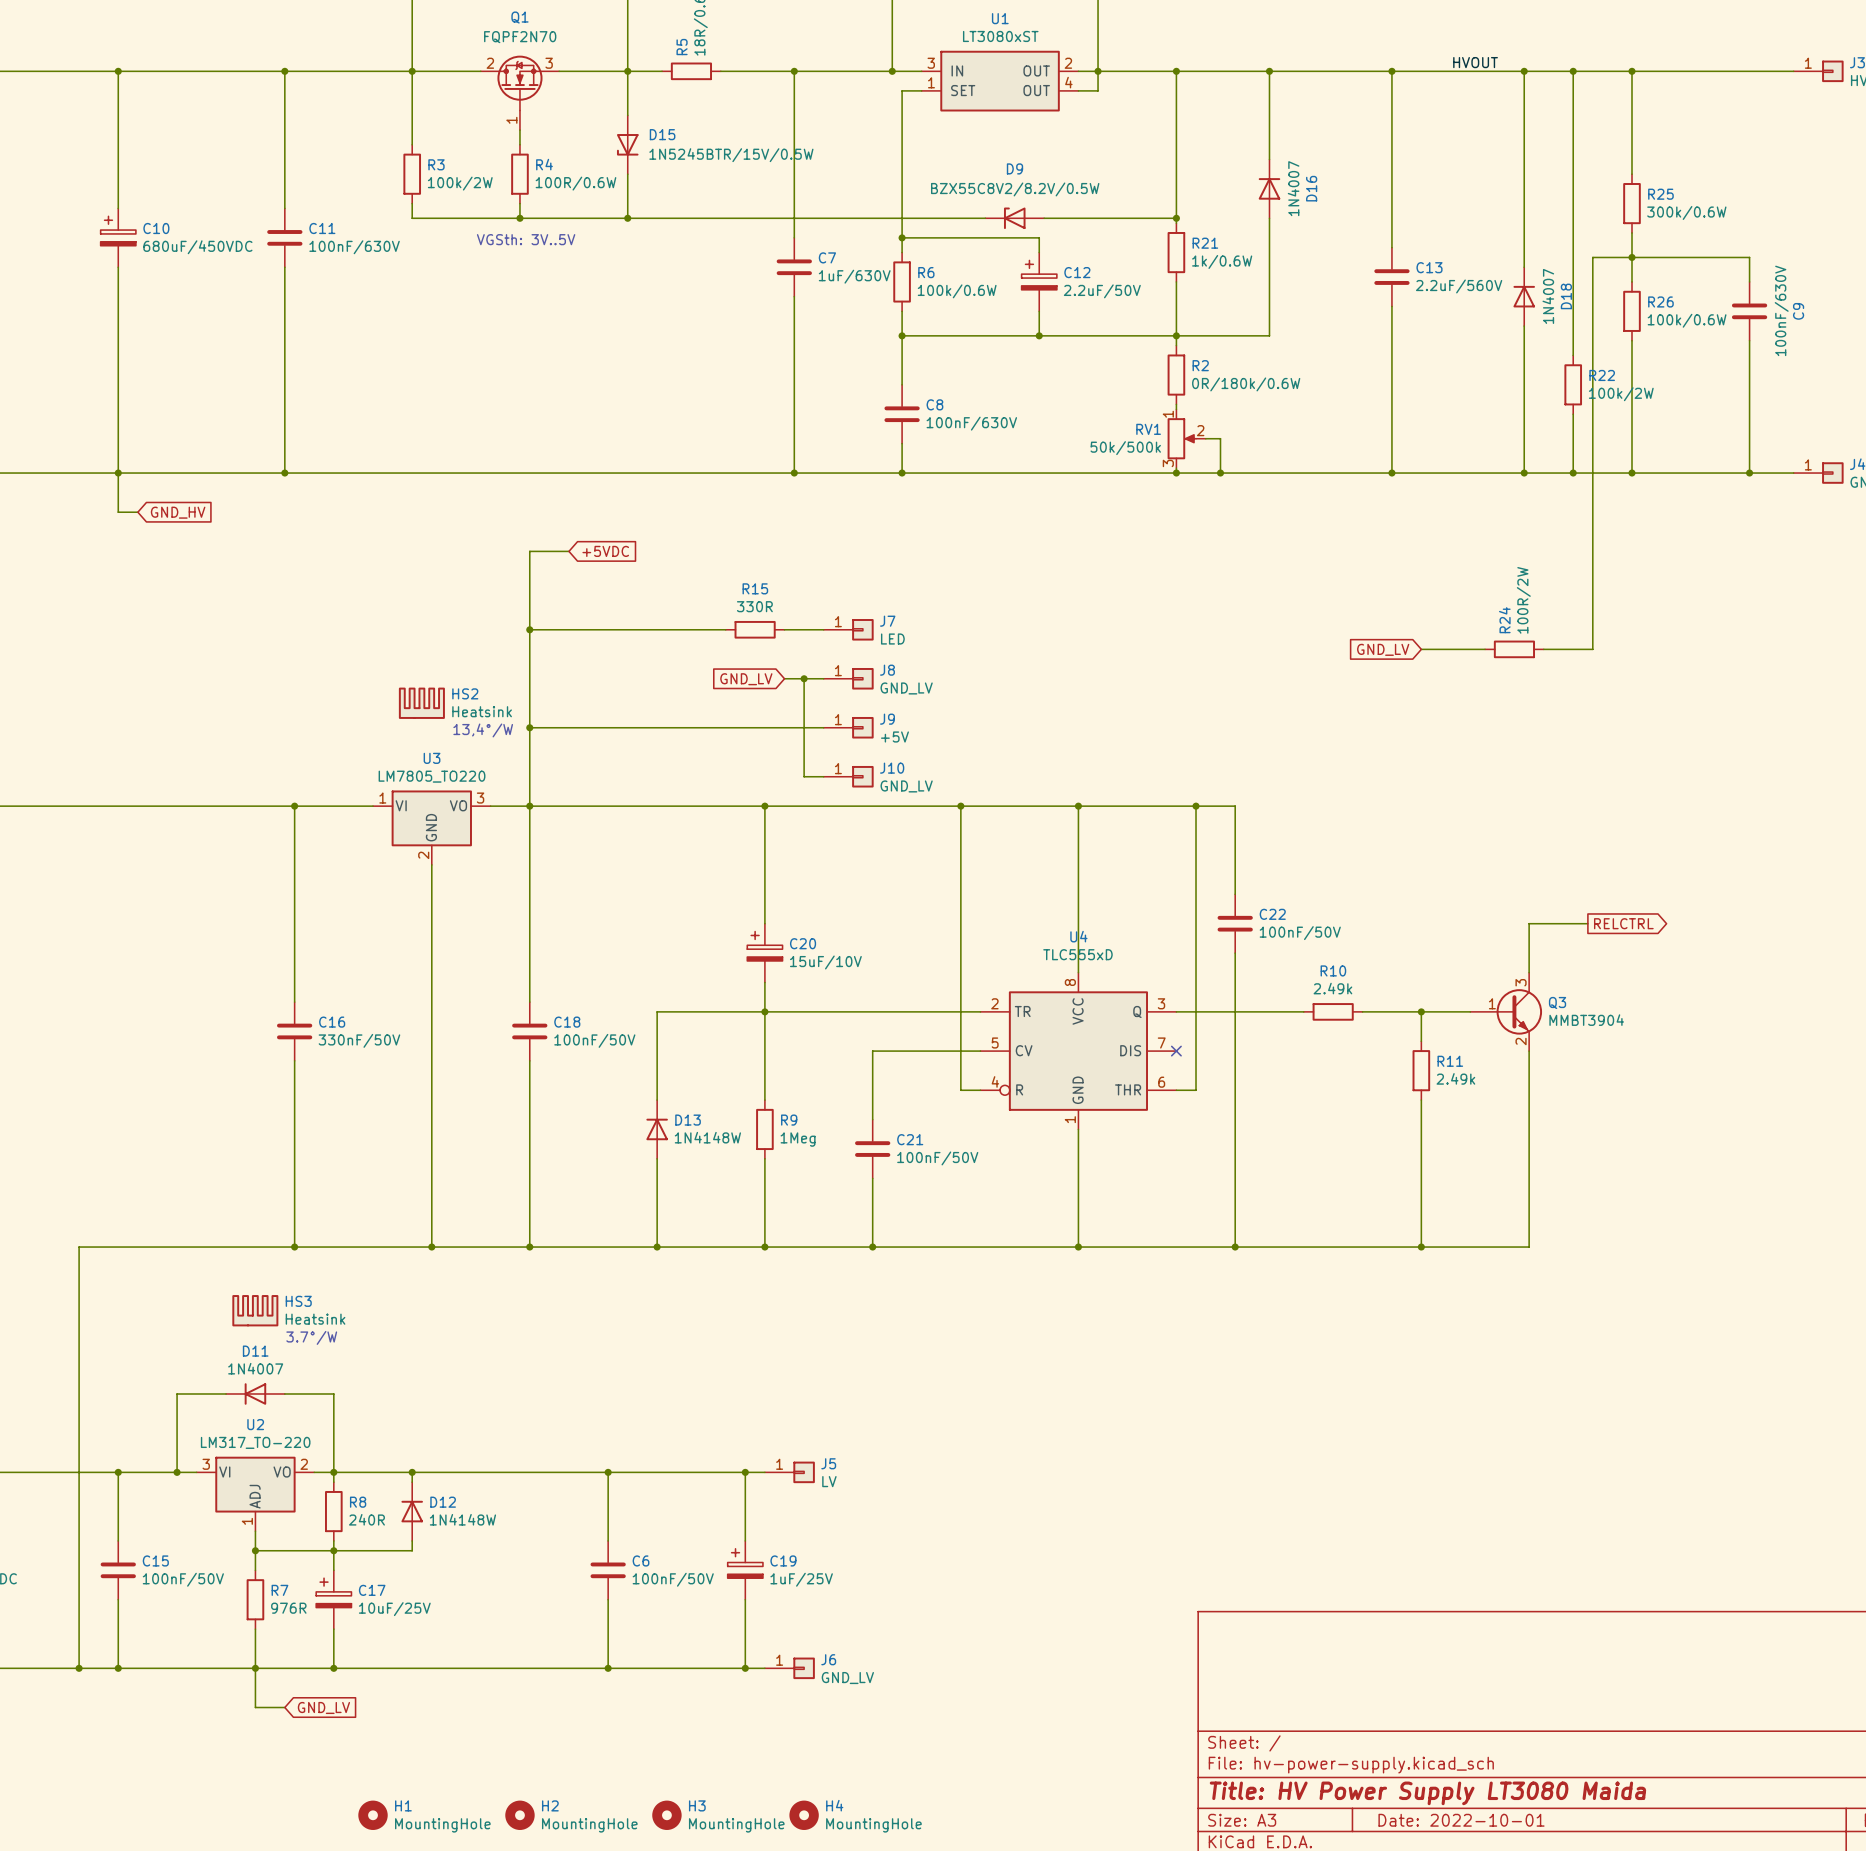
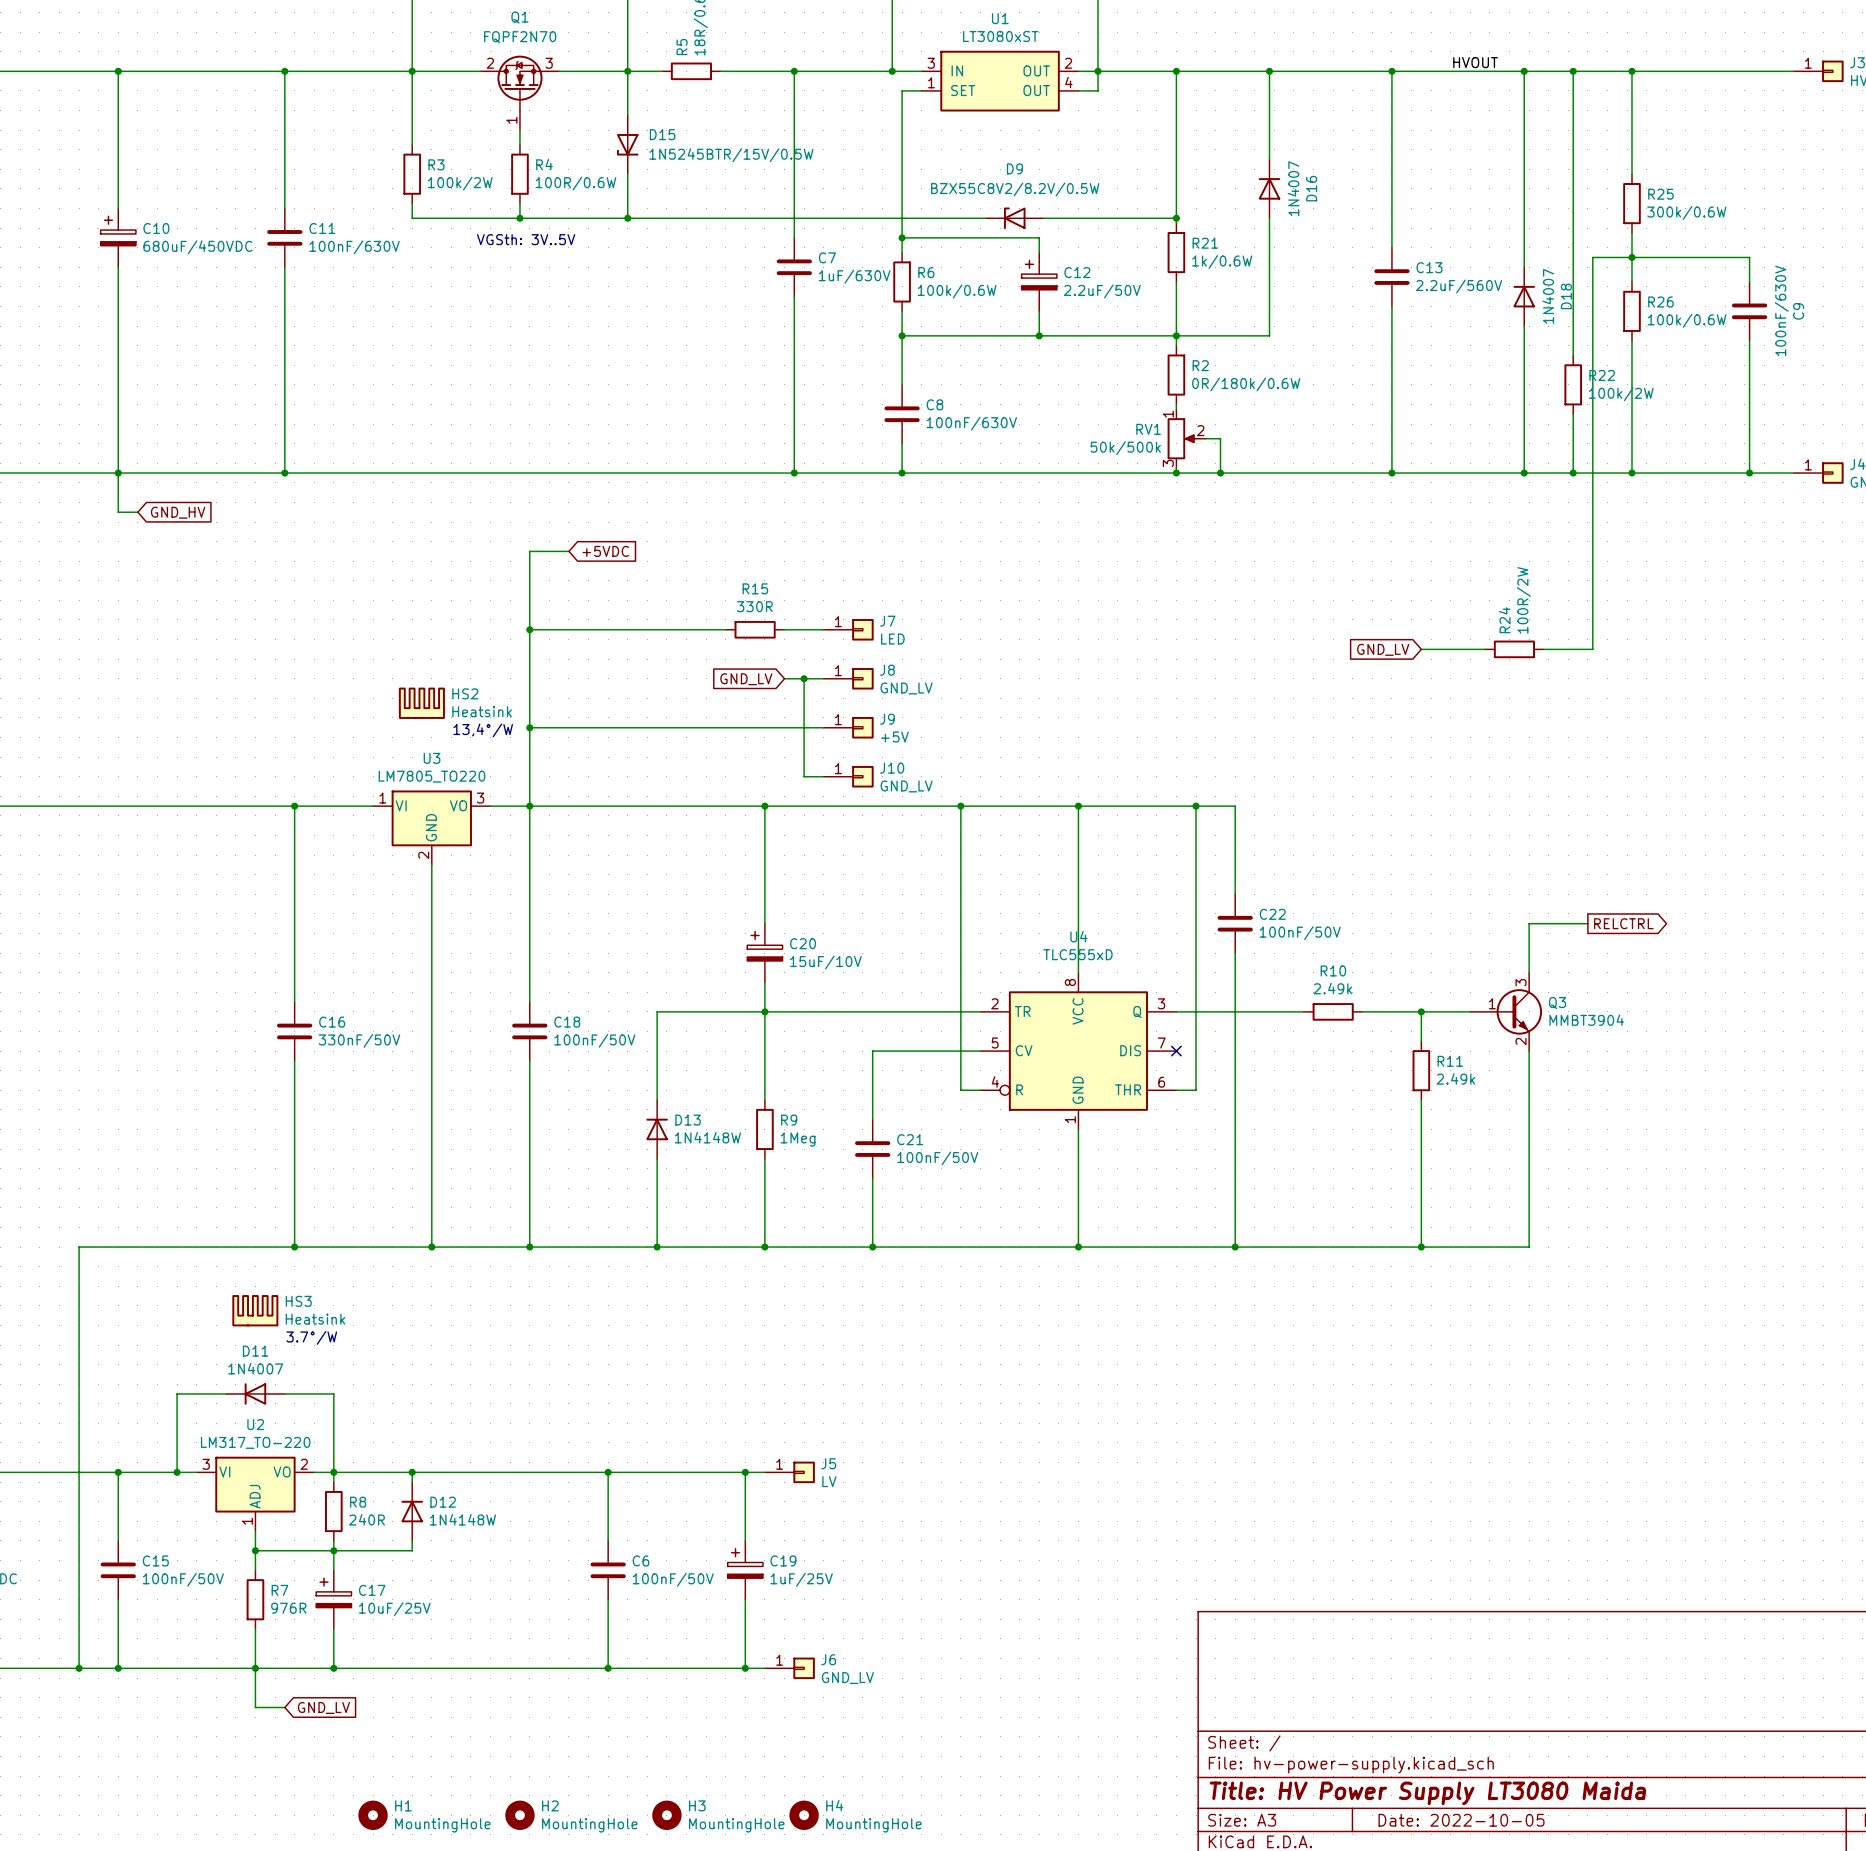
title block: Date: 2022-10-01 (1461, 1820) -> Date: 2022-10-05 (1461, 1820)

